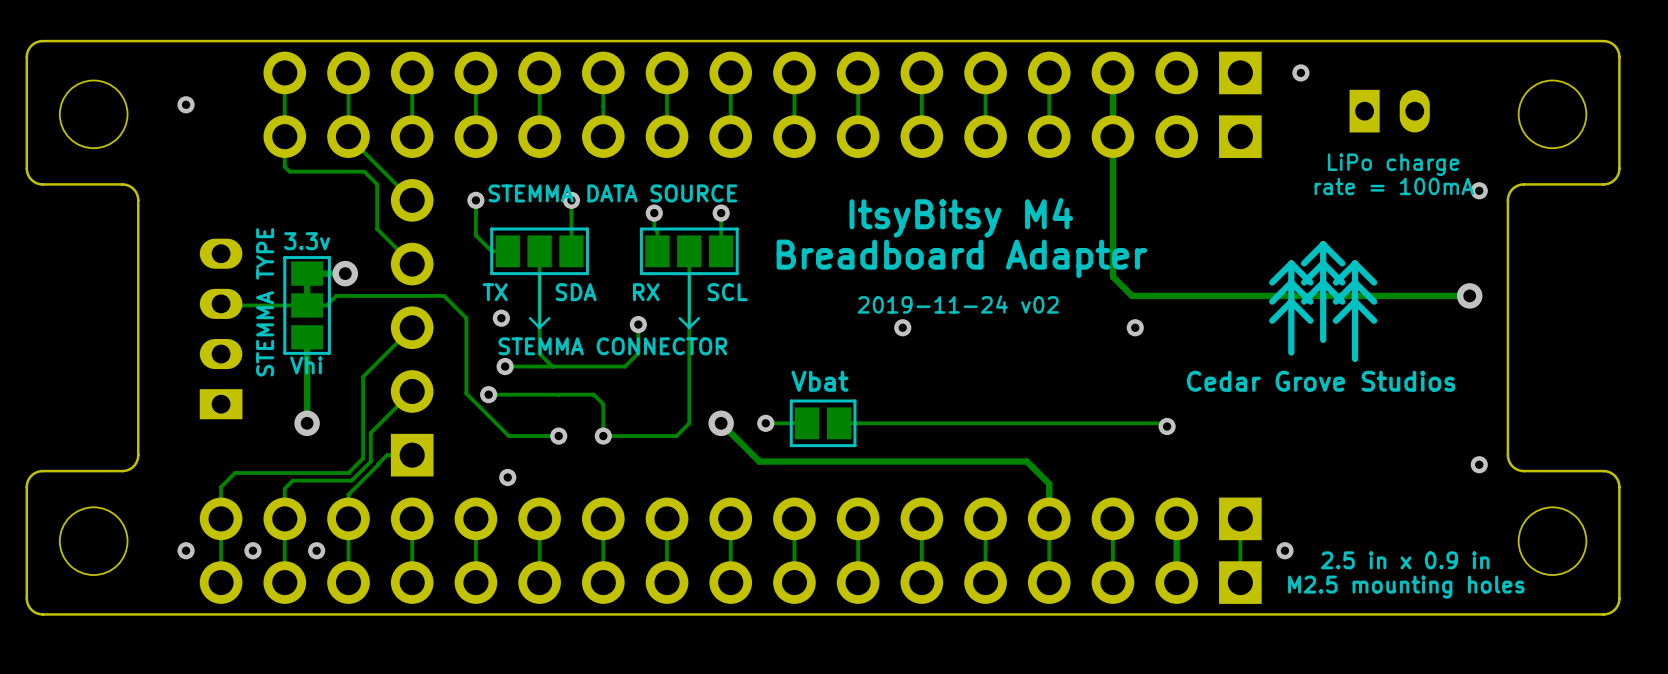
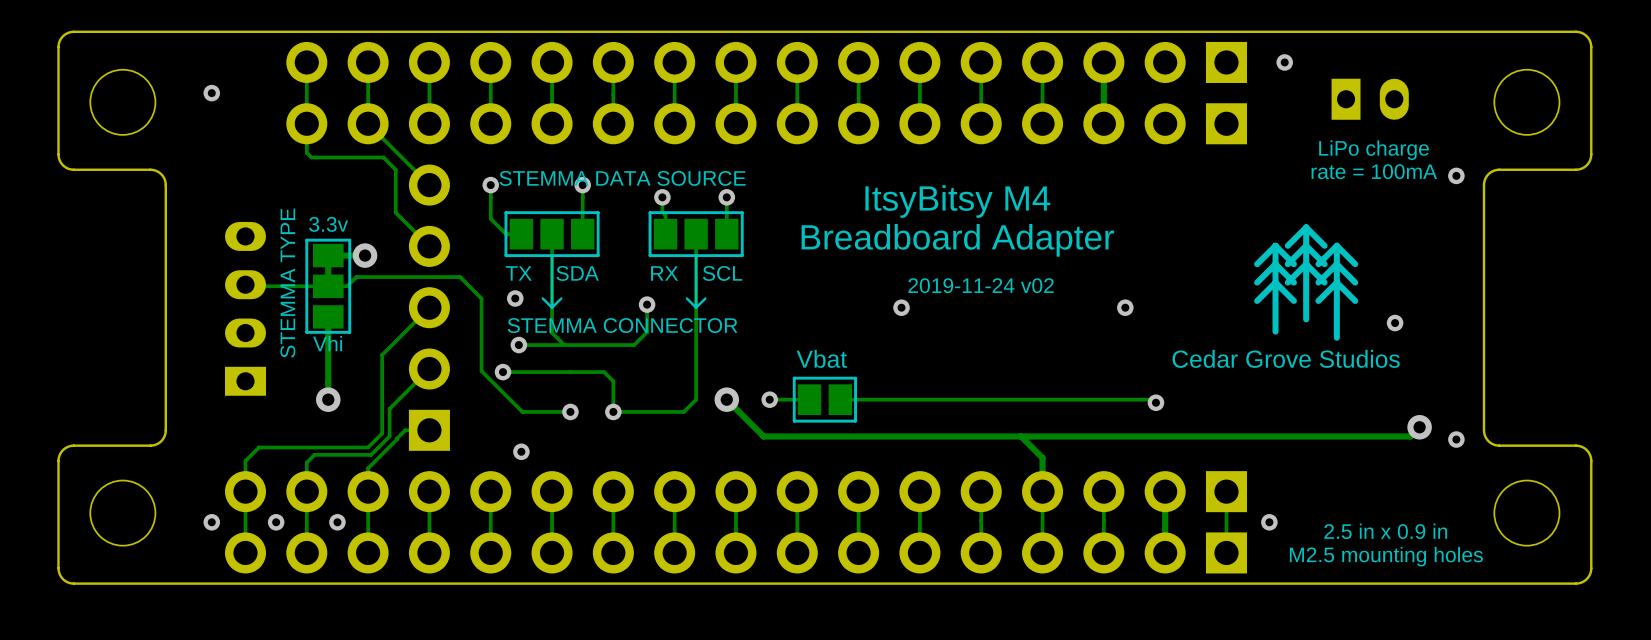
track: (1112, 136) (1112, 276) (1132, 295) (1469, 295) -> none
via: (1469, 295) -> none
via: none -> (1395, 323)
track: none -> (1419, 427) (1410, 436) (1021, 436)
via: none -> (1419, 427)

